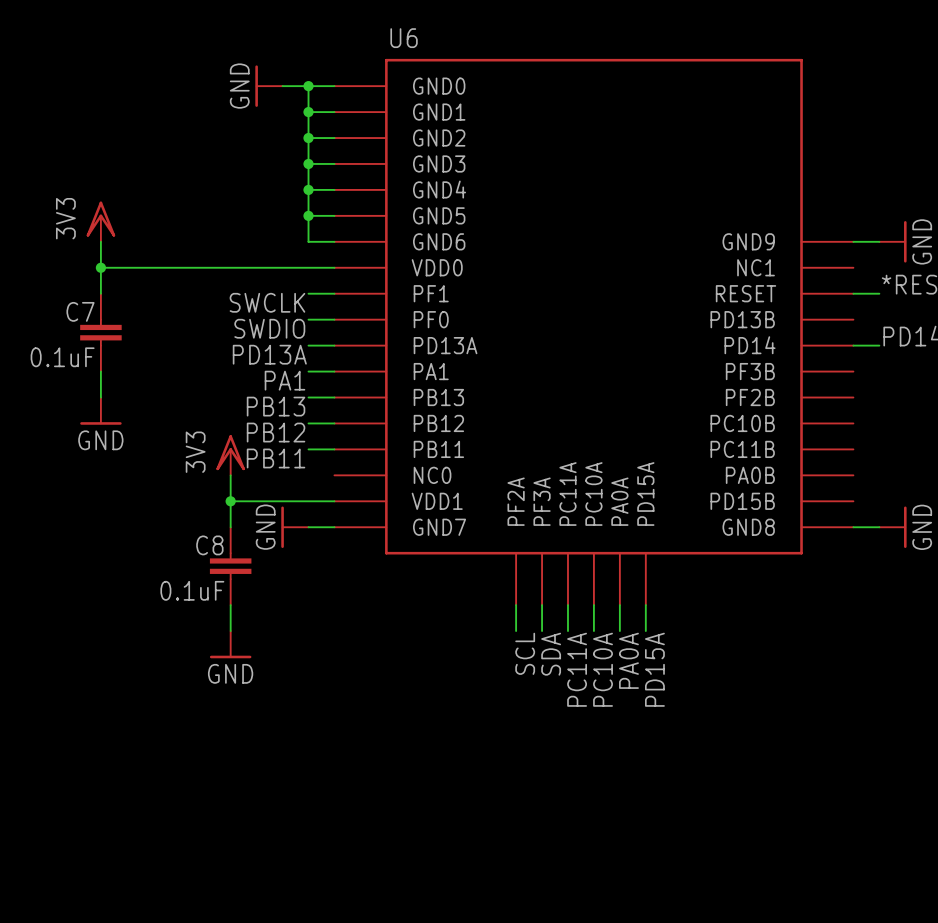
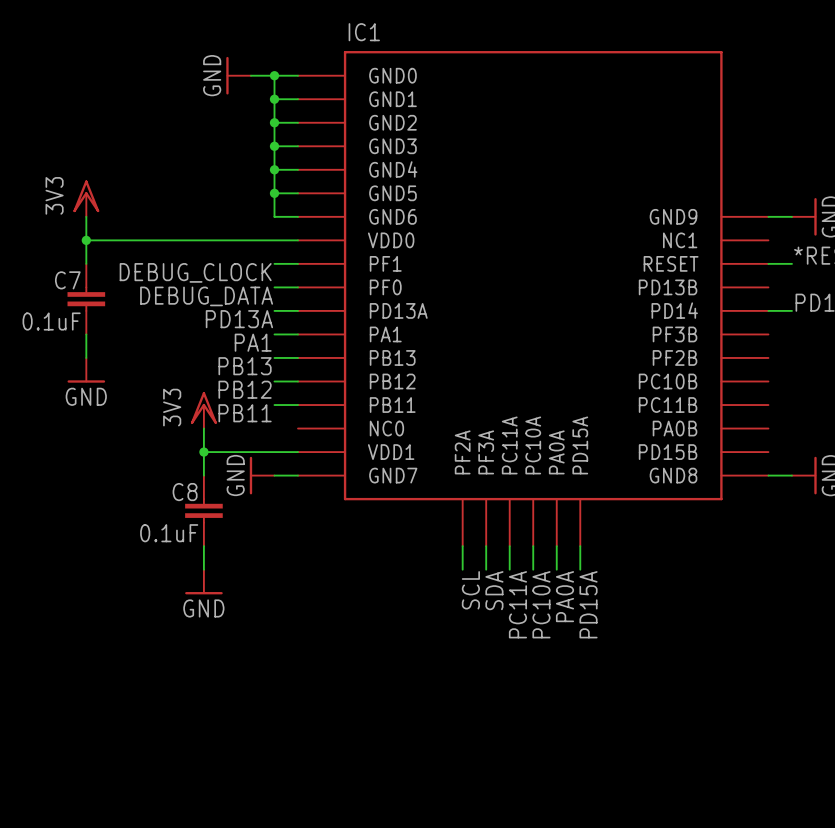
U6 name: U6 (404, 38) -> IC1 (364, 32)
label: SWCLK (267, 302) -> DEBUG_CLOCK (195, 272)
label: SWDIO (269, 328) -> DEBUG_DATA (206, 296)

